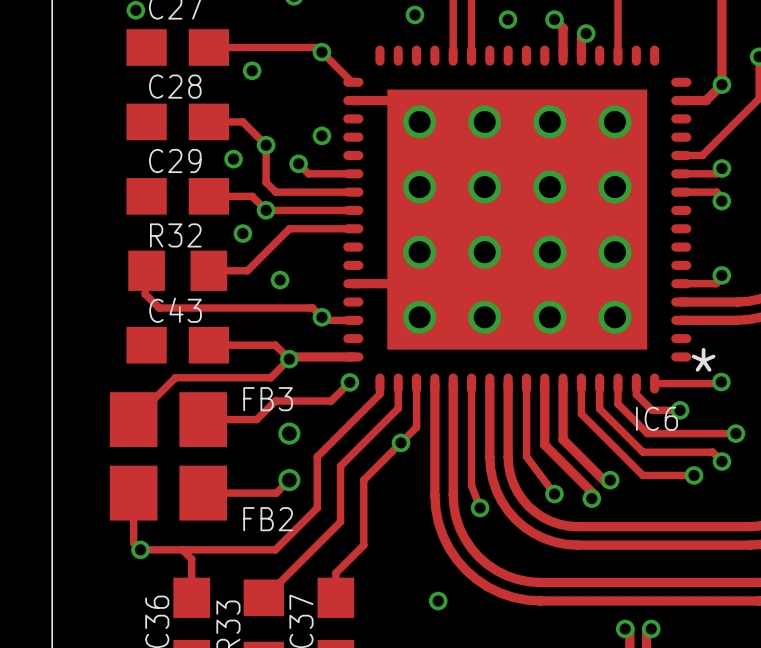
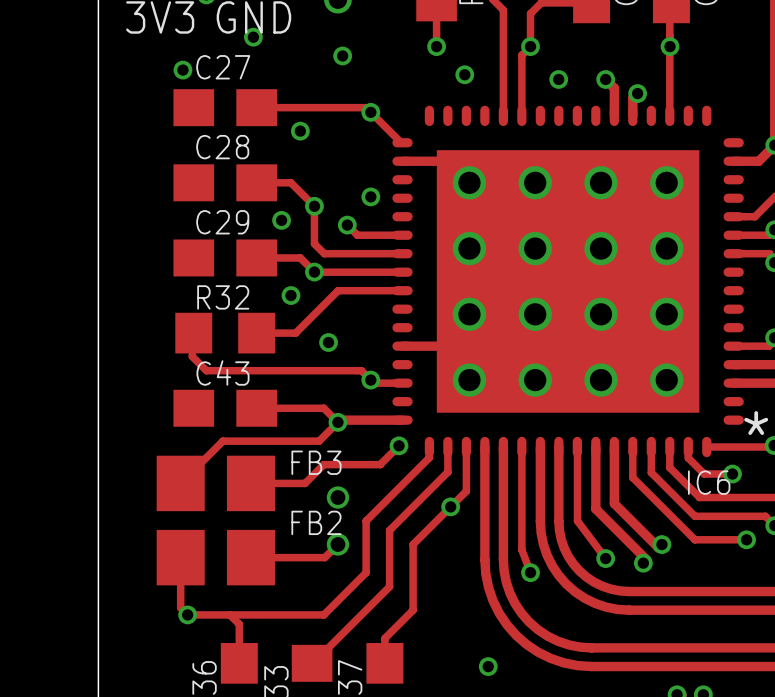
FB2 name position: FB2 (268, 519) -> FB2 (316, 522)

